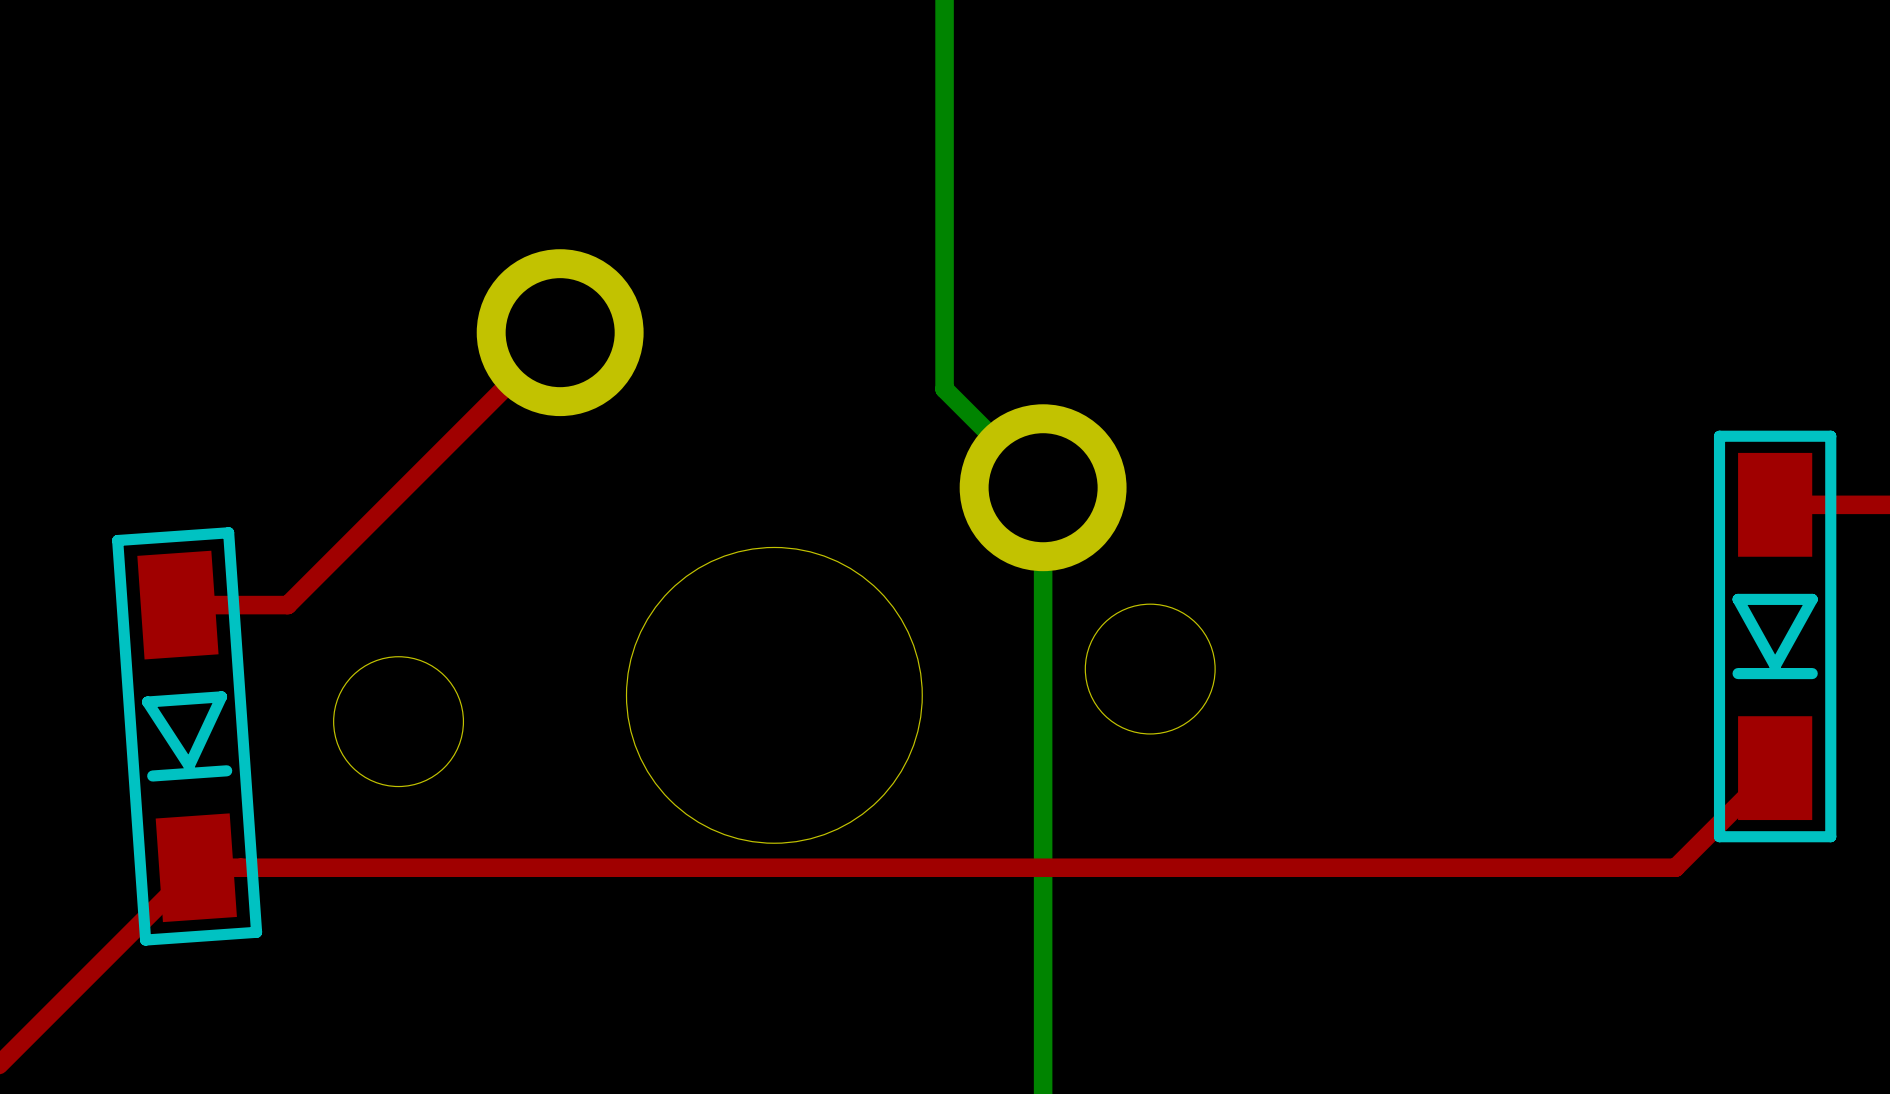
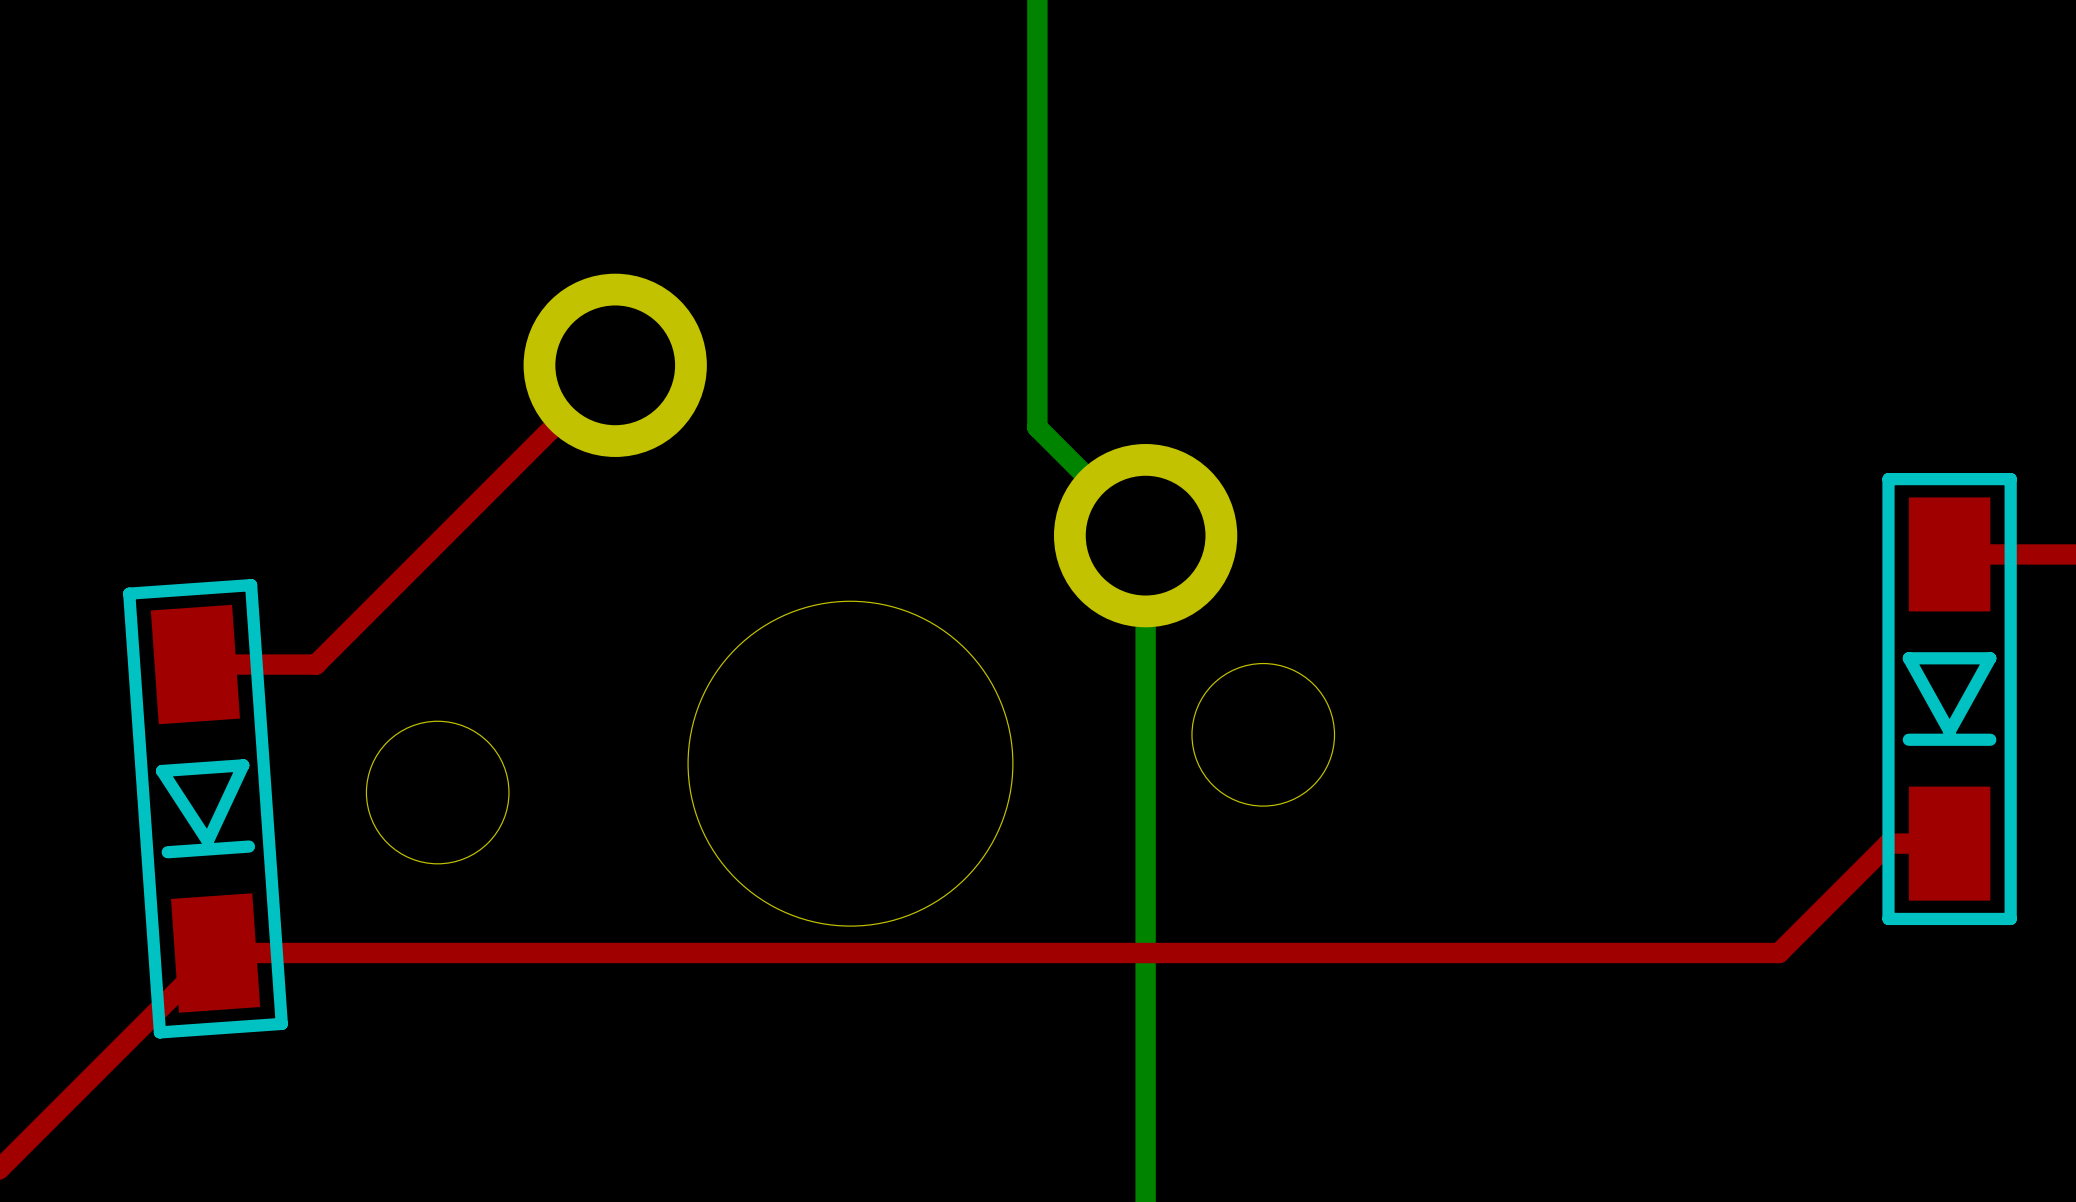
top track: (1775, 768) (1675, 867) (1619, 867) -> (1949, 843) (1888, 843) (1779, 953)

